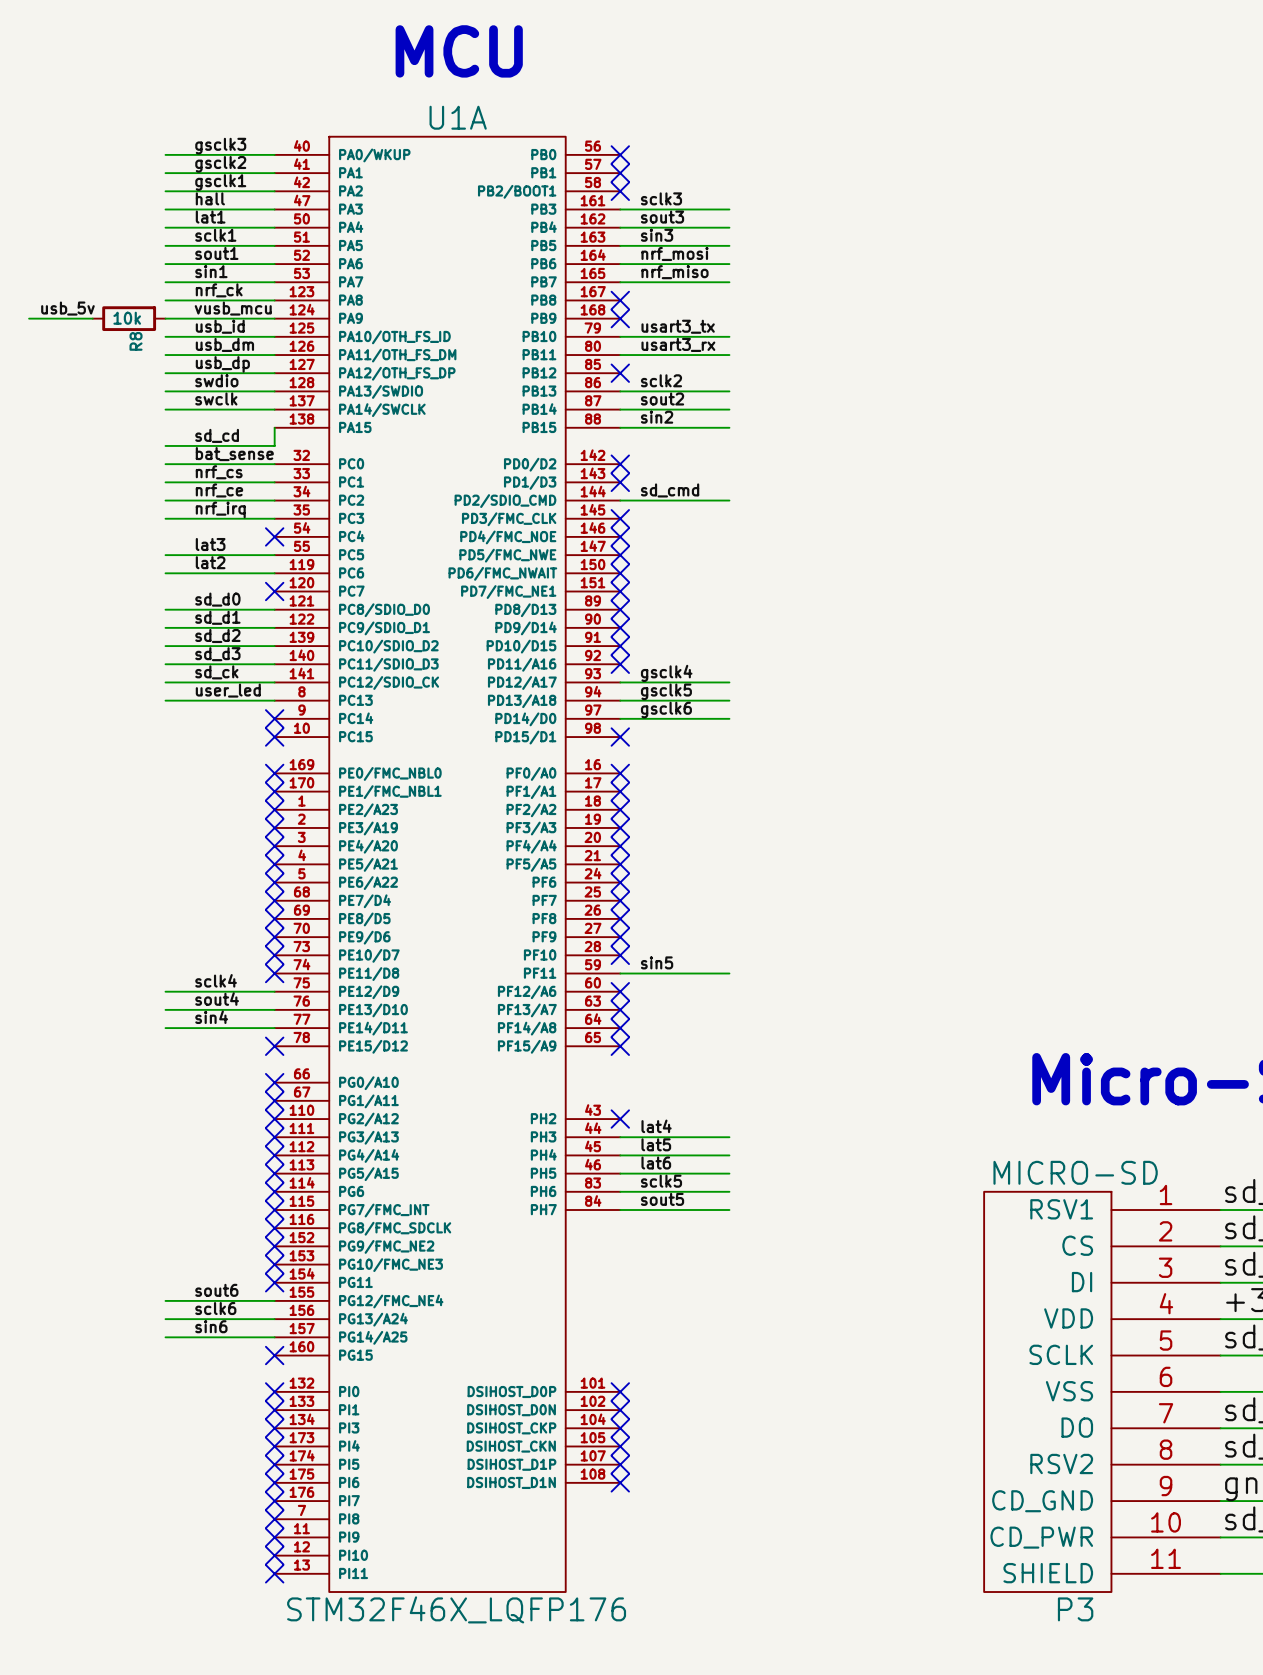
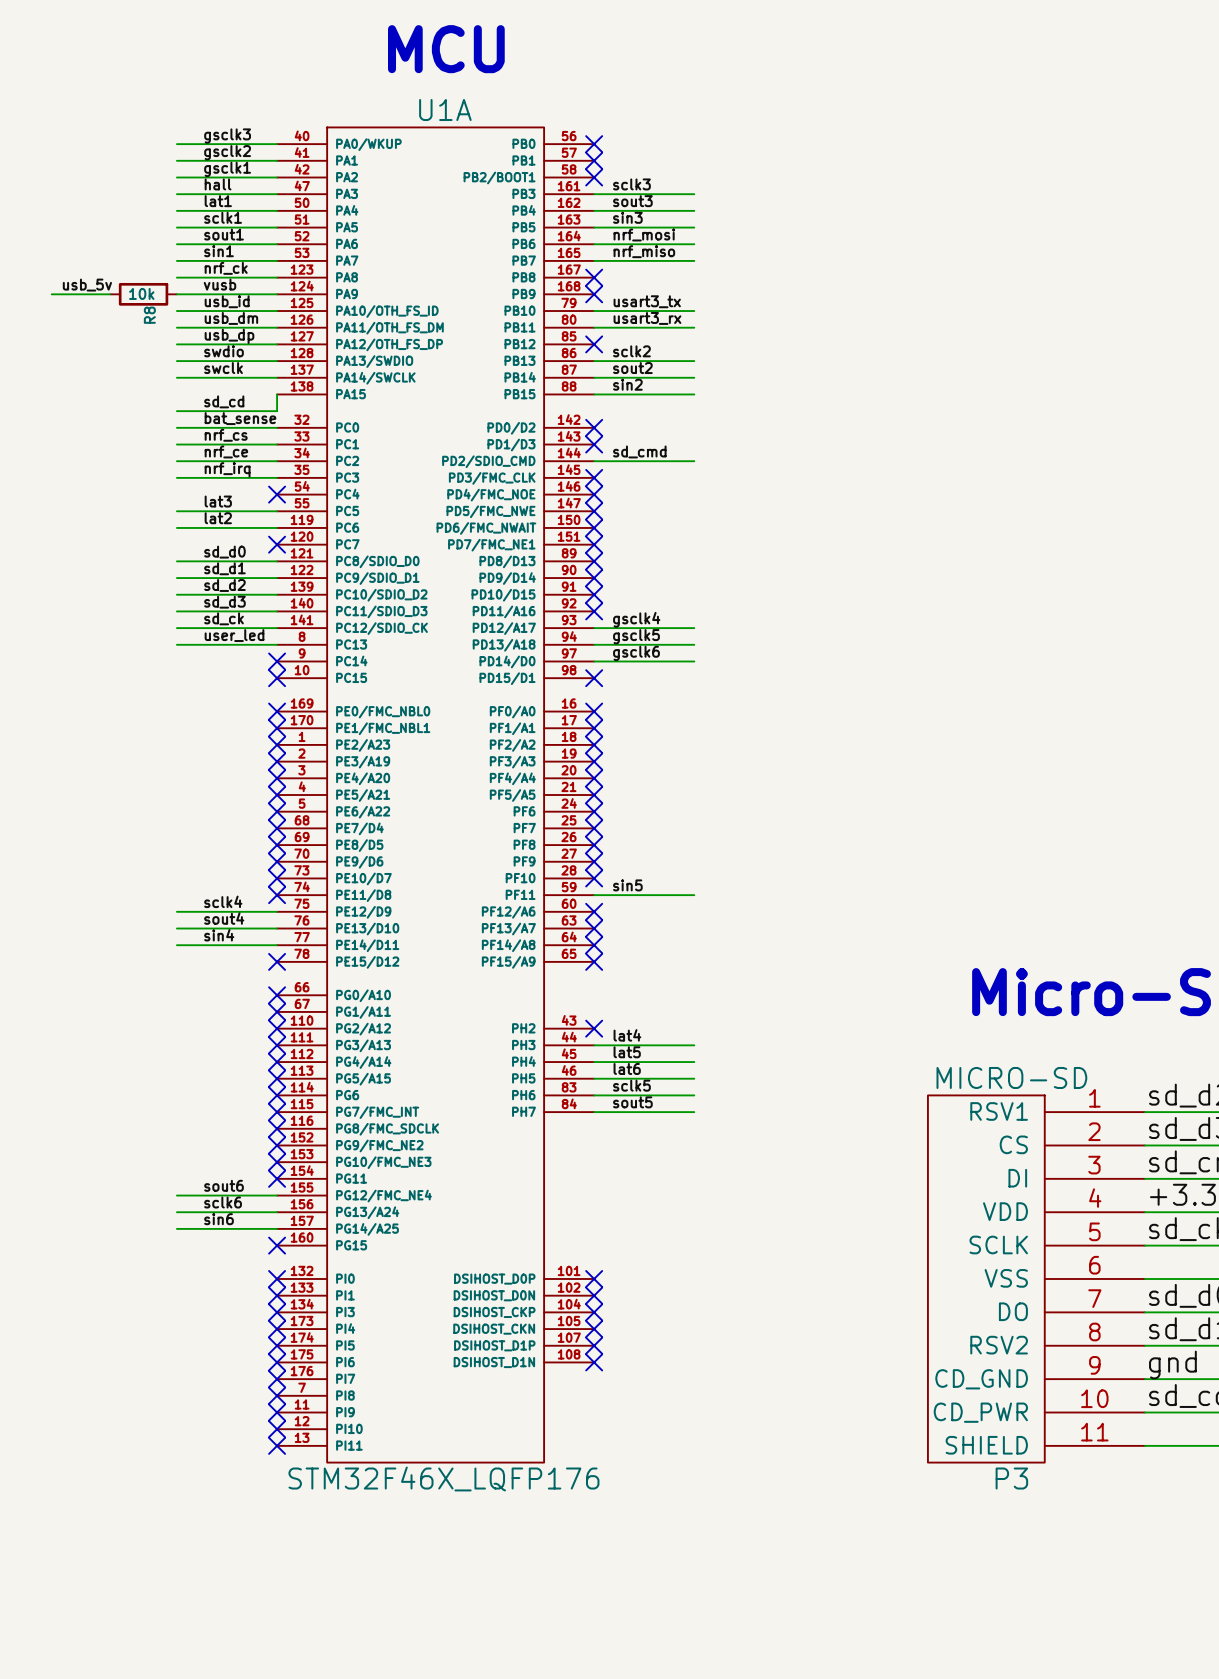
label: vusb_mcu (233, 308) -> vusb (219, 284)

